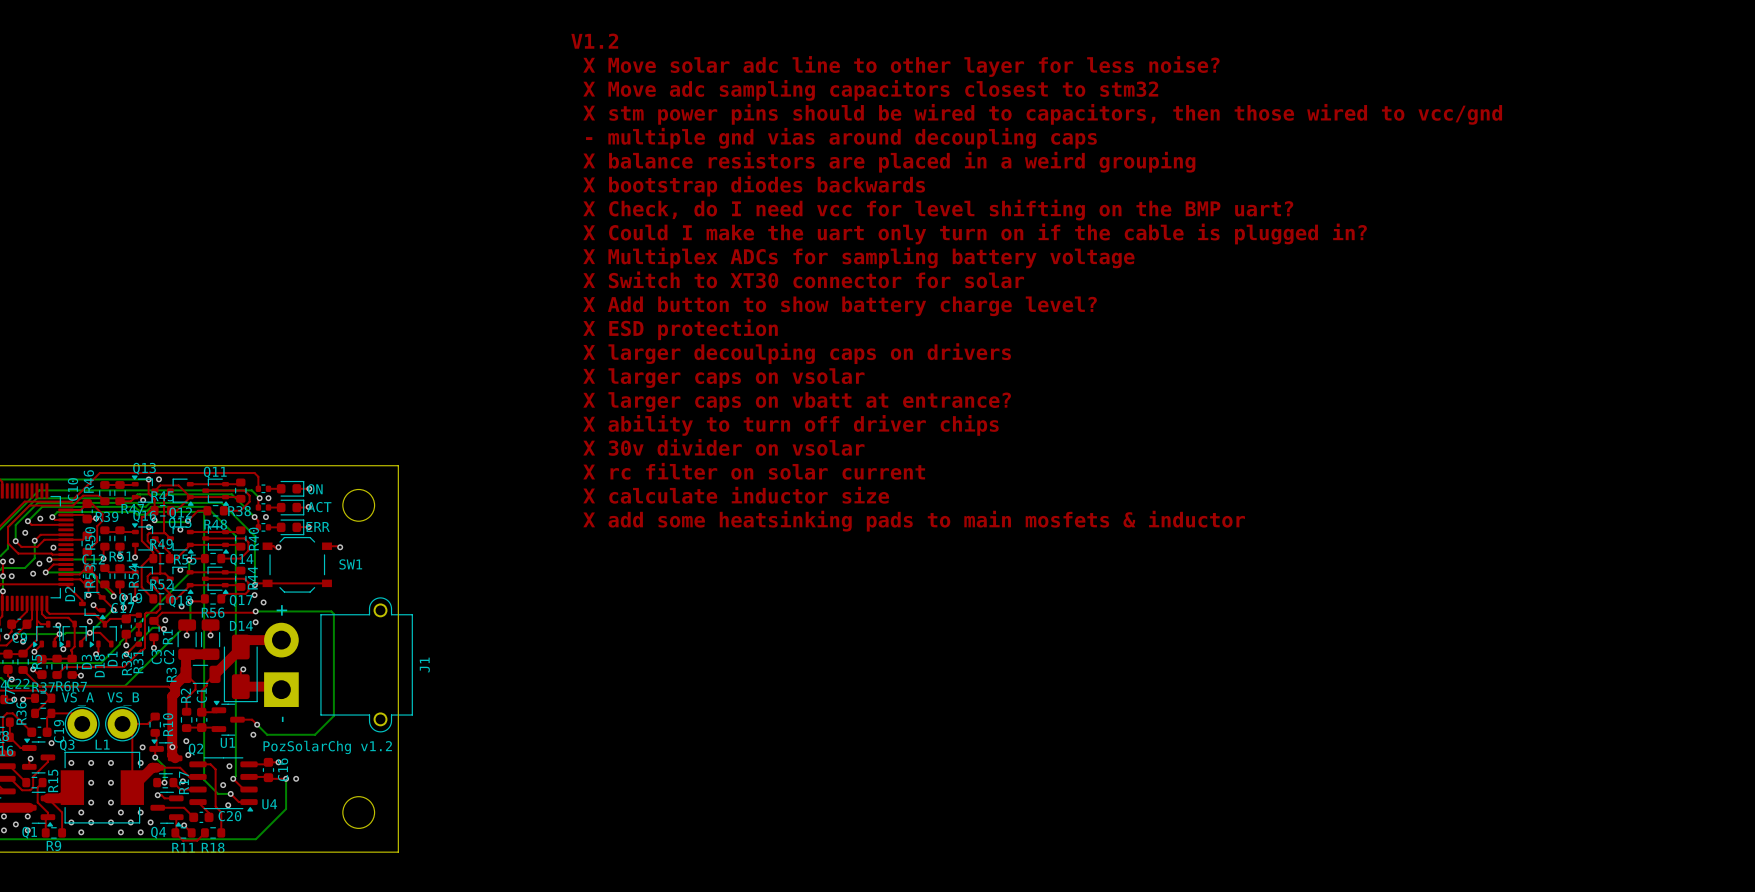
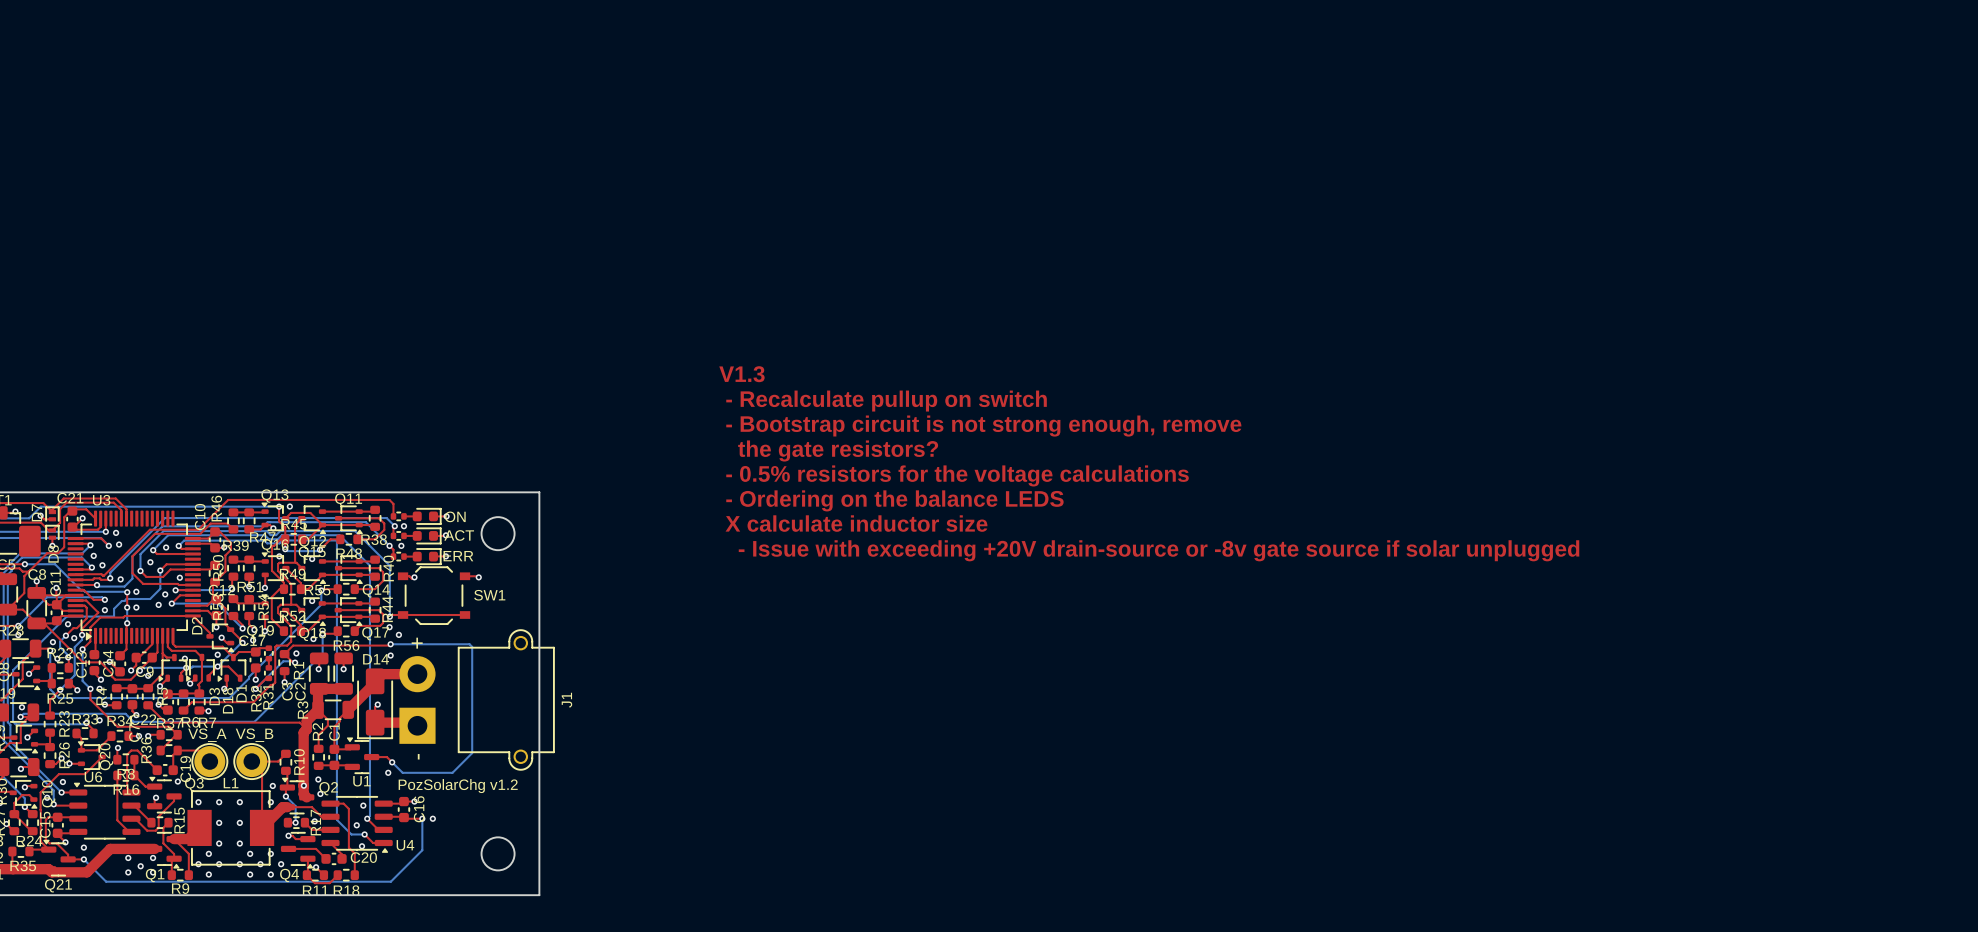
text: V1.2 (594, 41) -> none
text: X Move solar adc line to other layer for less noise? (901, 66) -> none
text: X Move adc sampling capacitors closest to stm32 (870, 90) -> none
text: X stm power pins should be wired to capacitors, then those wired to vcc/gnd (1042, 114) -> none
text: - multiple gnd vias around decoupling caps (841, 138) -> none
text: X balance resistors are placed in a weird grouping (889, 162) -> none
text: X bootstrap diodes backwards (754, 186) -> none
text: X Check, do I need vcc for level shifting on the BMP uart? (938, 210) -> none
text: X Could I make the uart only turn on if the cable is plugged in? (975, 233) -> none
text: X Multiplex ADCs for sampling battery voltage (858, 257) -> none
text: X Switch to XT30 connector for solar (803, 279) -> none
text: X Add button to show battery charge level? (840, 306) -> none
text: X ESD protection (680, 329) -> none
text: X larger decoulping caps on drivers (797, 353) -> V1.3 (741, 374)
text: X larger caps on vsolar (723, 378) -> - Recalculate pullup on switch (886, 401)
text: X larger caps on vbatt at entrance? (797, 402) -> - Bootstrap circuit is not strong enough, remove (983, 426)
text: X ability to turn off driver chips (790, 425) -> the gate resistors? (838, 450)
text: X 30v divider on vsolar (723, 447) -> - 0.5% resistors for the voltage calculations (957, 475)
text: X rc filter on solar current (754, 471) -> - Ordering on the balance LEDS (894, 500)
text: X add some heatsinking pads to main mosfets & inductor (914, 521) -> - Issue with exceeding +20V drain-source or -8v gate source if solar unplugged (1159, 550)

